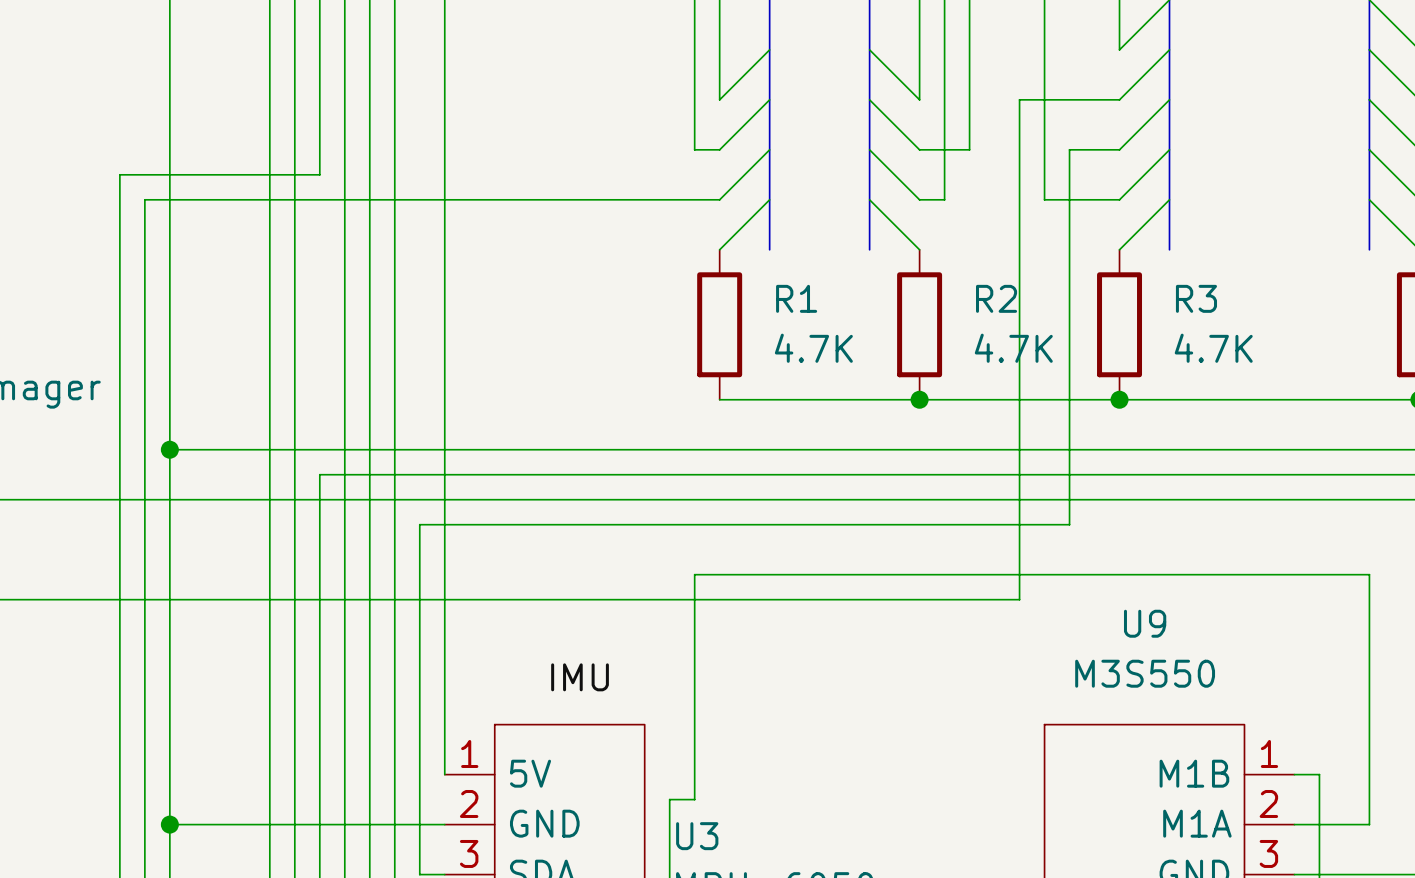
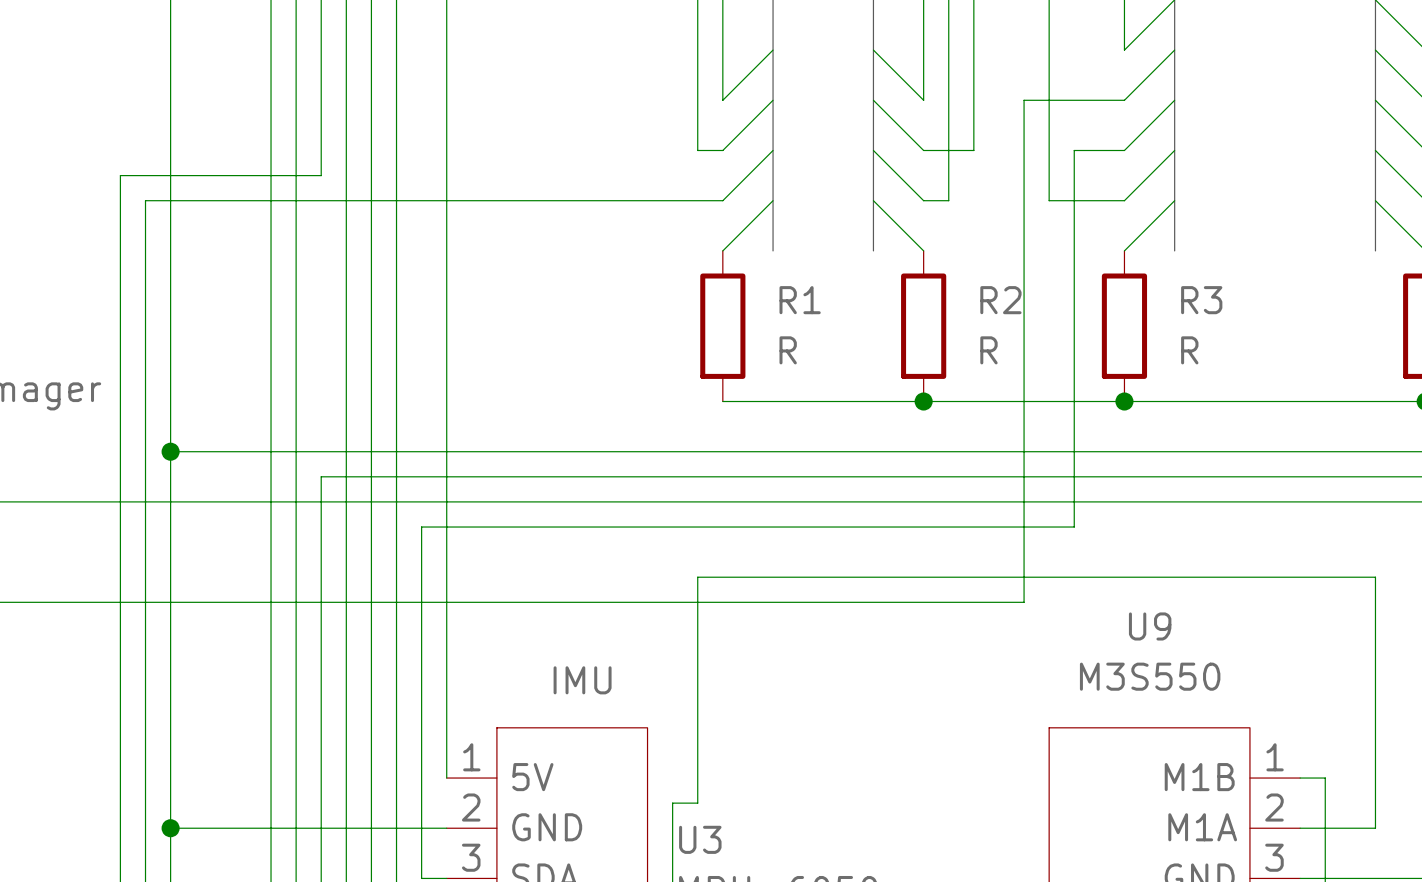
R1 value: 4.7K (813, 348) -> R (788, 350)
R2 value: 4.7K (1013, 348) -> R (988, 350)
R3 value: 4.7K (1213, 348) -> R (1189, 350)

